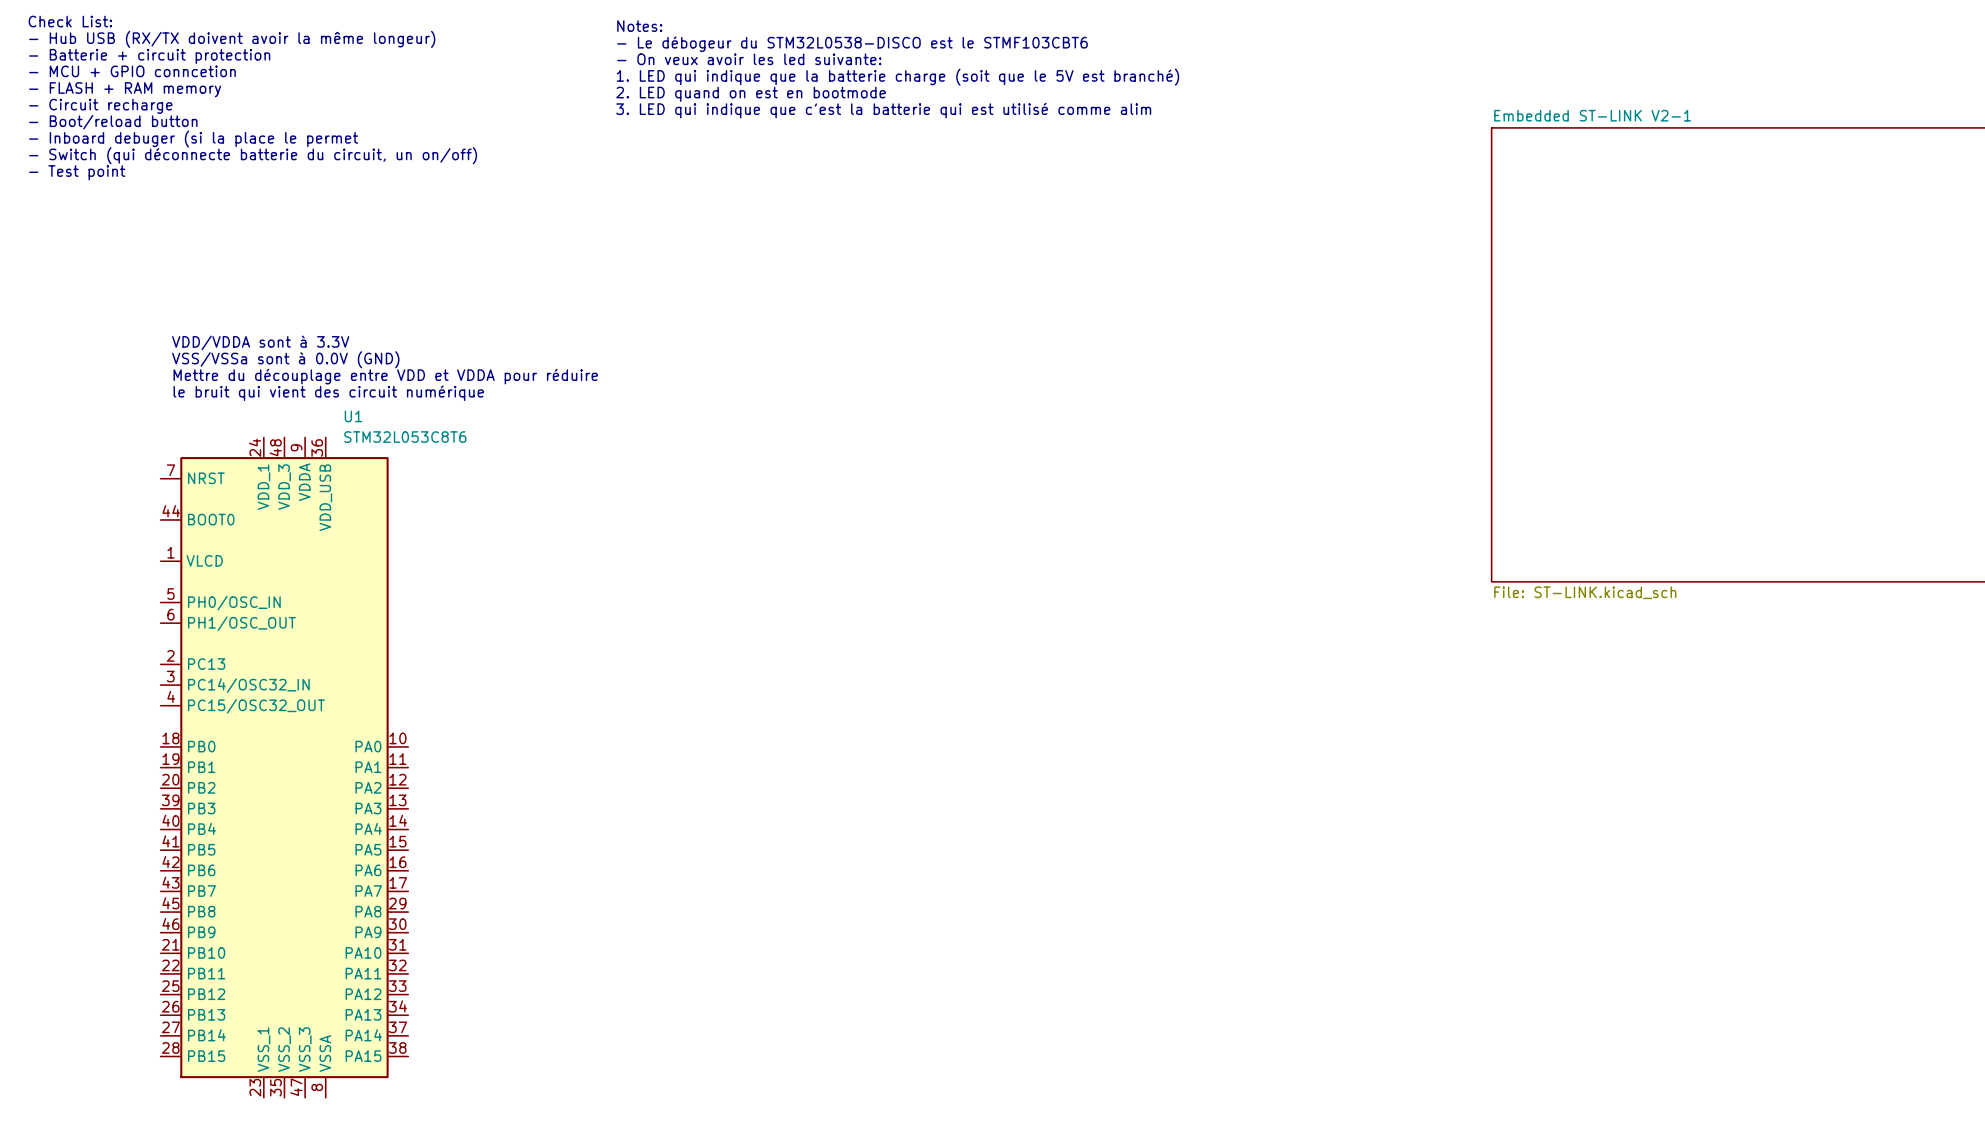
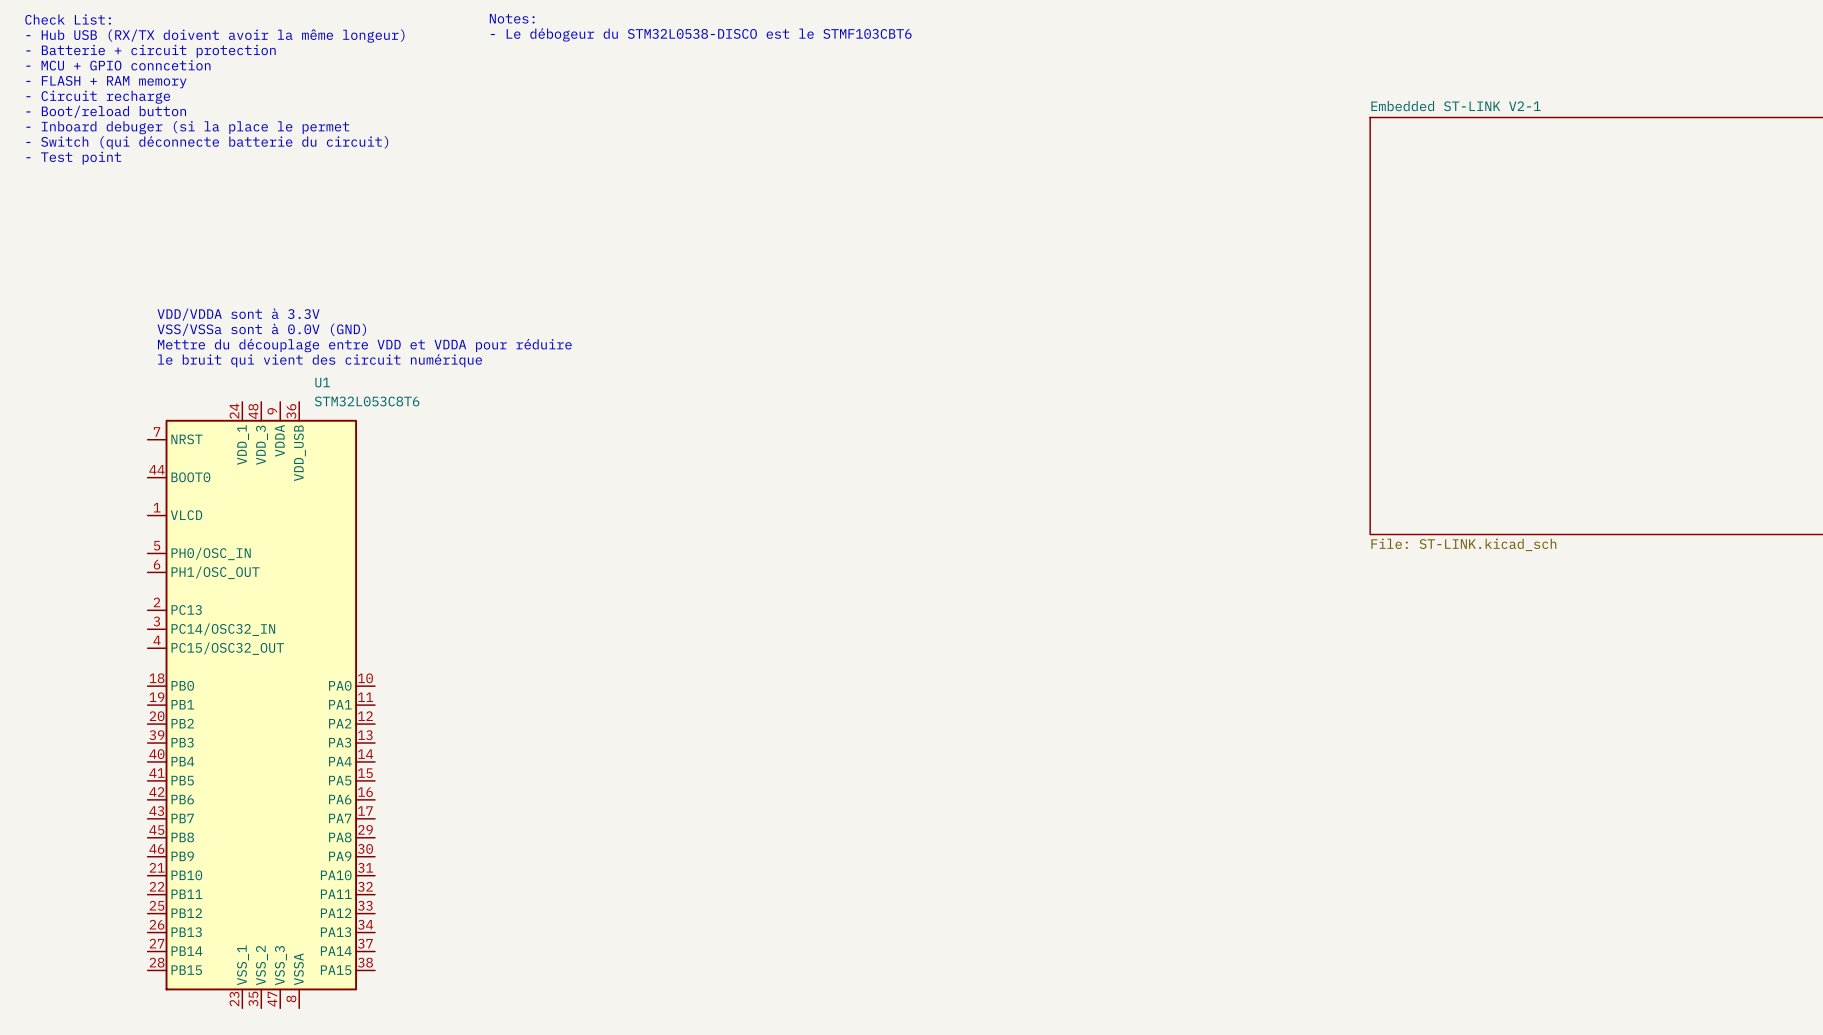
text position: Notes: (639, 26) -> Notes: (512, 18)
text position: - Le débogeur du STM32L0538-DISCO est le STMF103CBT6 (852, 44) -> - Le débogeur du STM32L0538-DISCO est le STMF103CBT6 (701, 34)
text: - On veux avoir les led suivante: (749, 59) -> none
text: 1. LED qui indique que la batterie charge (soit que le 5V est branché) (897, 77) -> none
text: 2. LED quand on est en bootmode (751, 94) -> none
text: 3. LED qui indique que c'est la batterie qui est utilisé comme alim (883, 110) -> none
text: - Switch (qui déconnecte batterie du circuit, un on/off) (253, 155) -> - Switch (qui déconnecte batterie du circuit) (207, 142)

